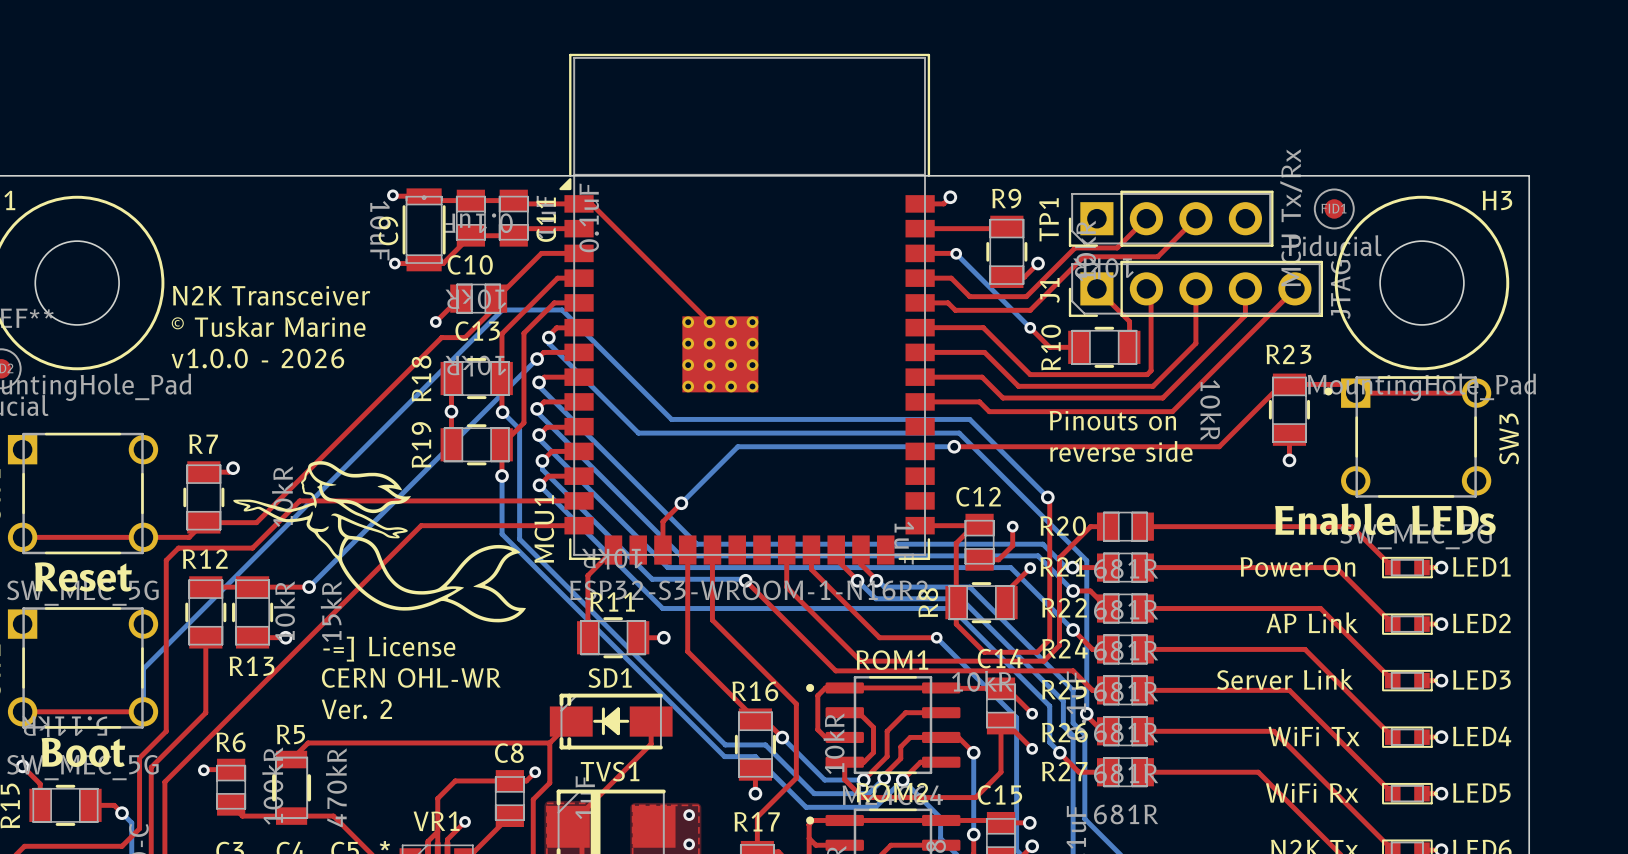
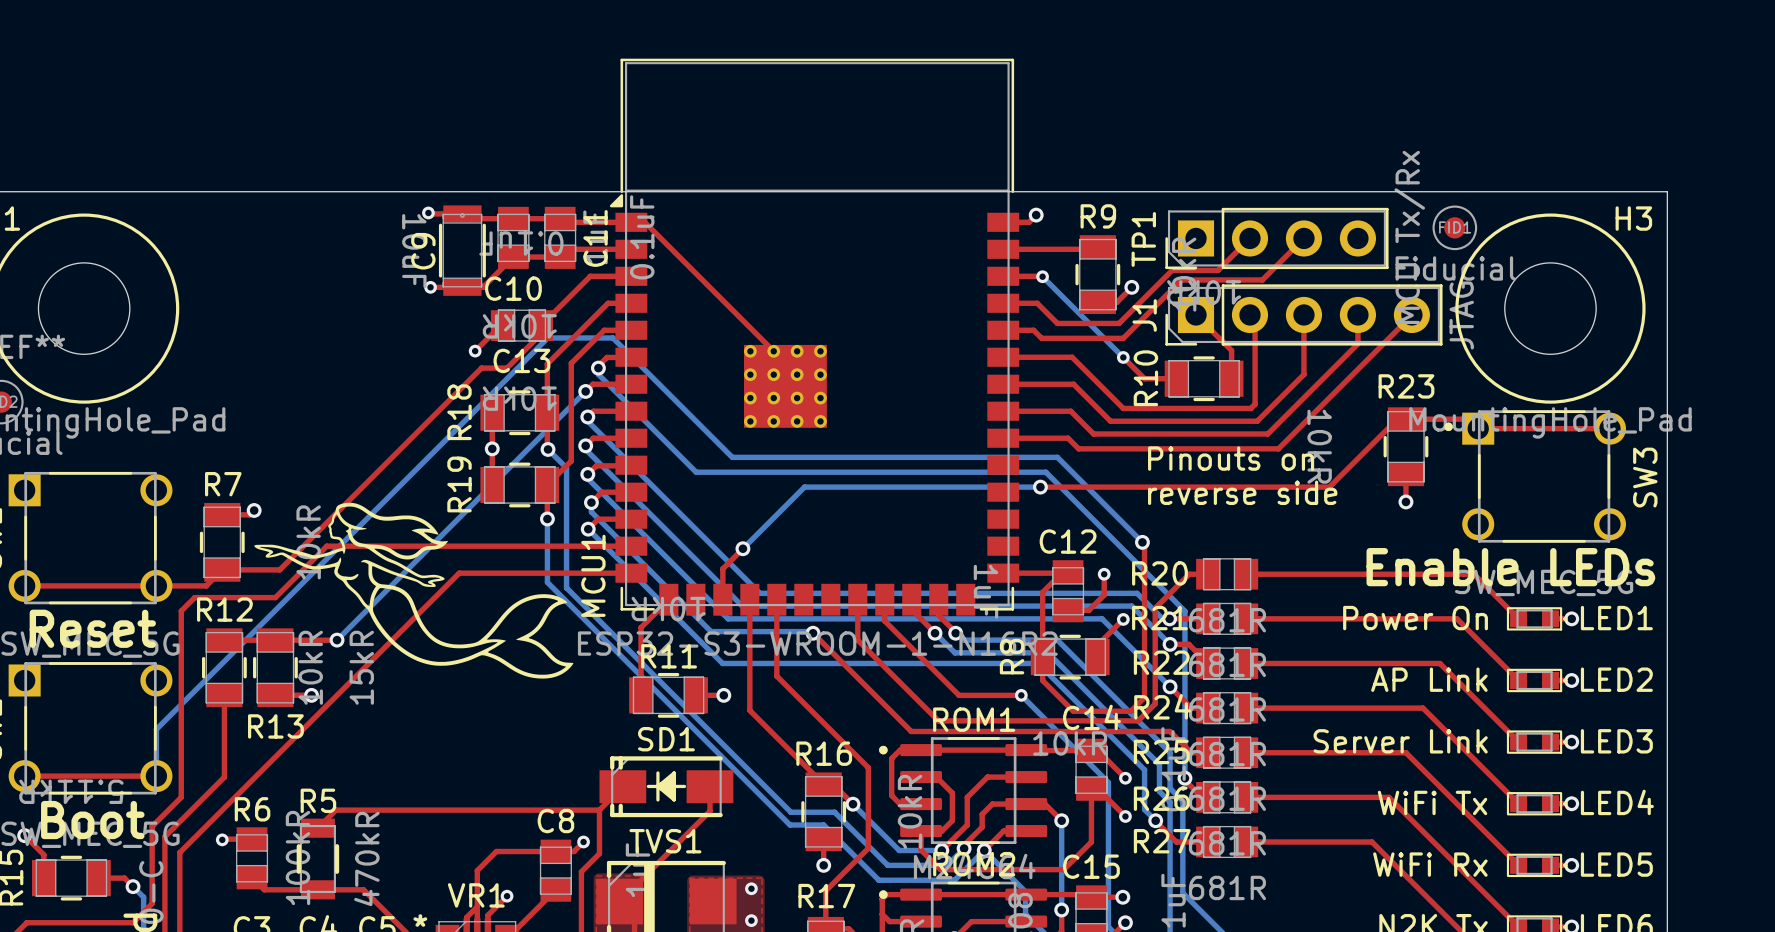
text: N2K Transceiver (271, 295) -> none
text: © Tuskar Marine (268, 326) -> none
text: v1.0.0 - 2026 (257, 358) -> none
text: -=] License (389, 649) -> none
text: CERN OHL-WR (411, 677) -> none
text: Ver. 2 (356, 709) -> none

